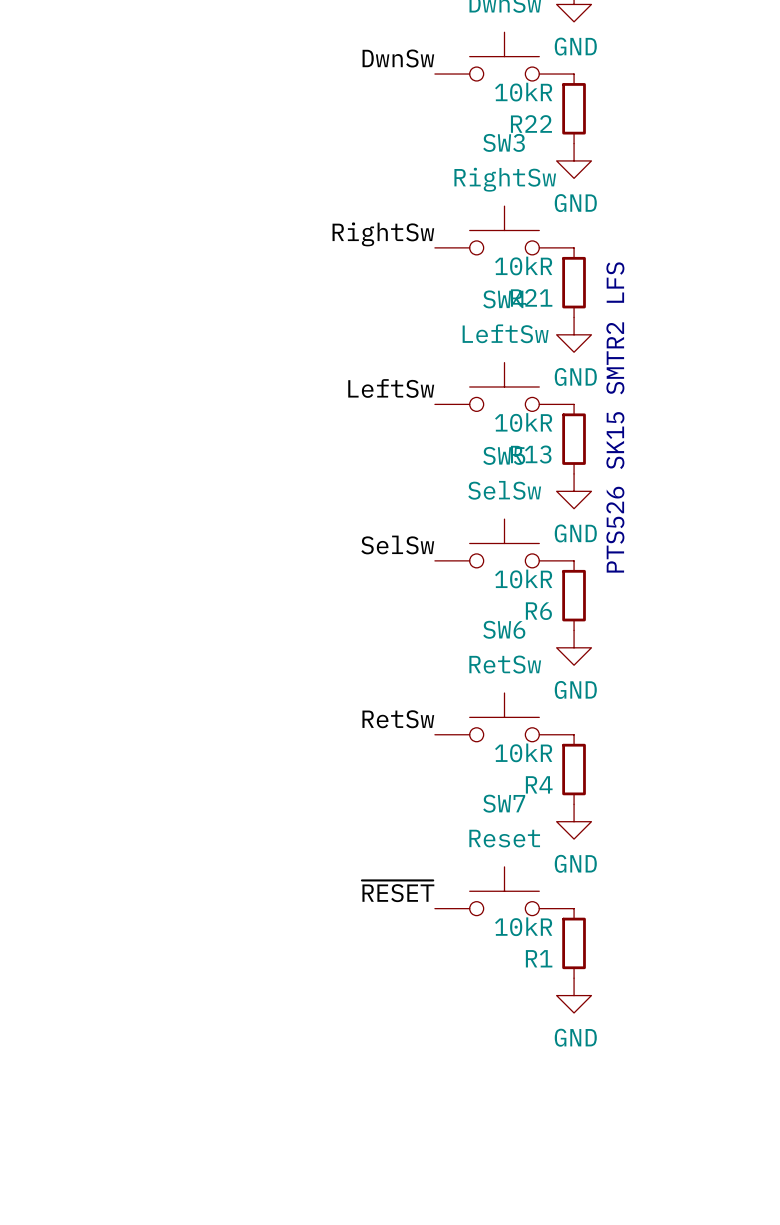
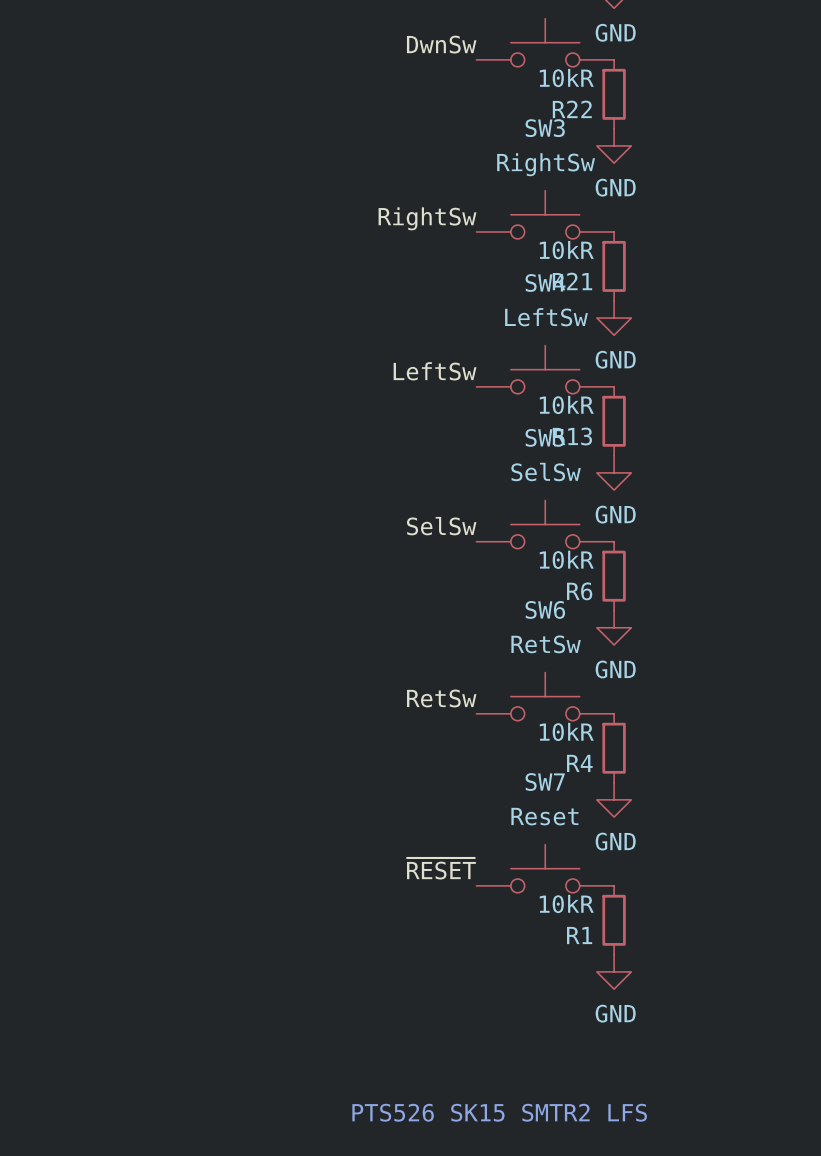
text: PTS526 SK15 SMTR2 LFS (615, 417) -> none
text: none -> PTS526 SK15 SMTR2 LFS (499, 1112)

